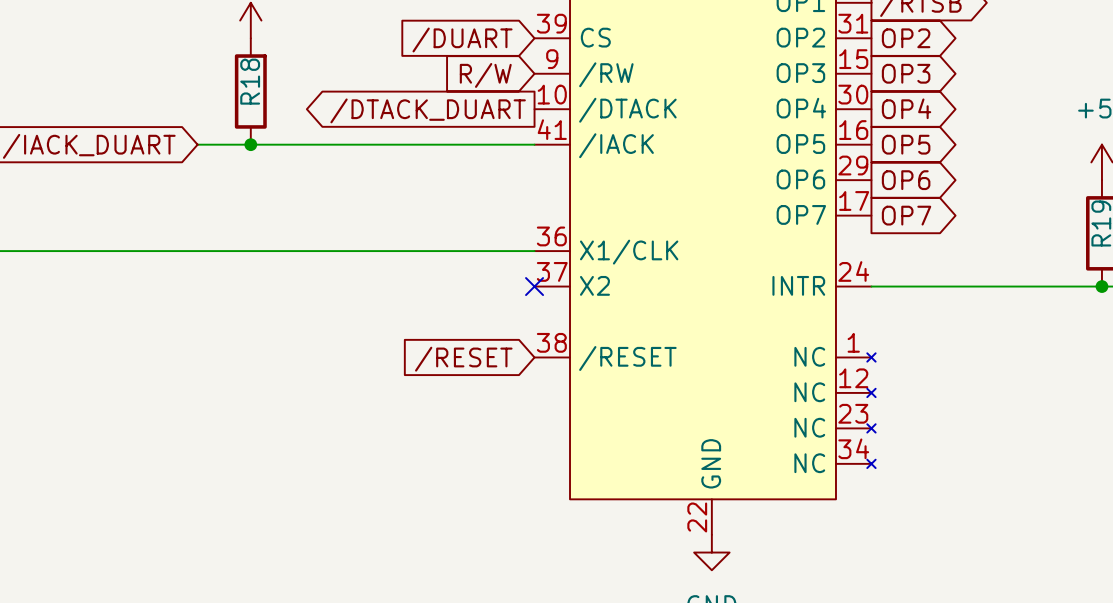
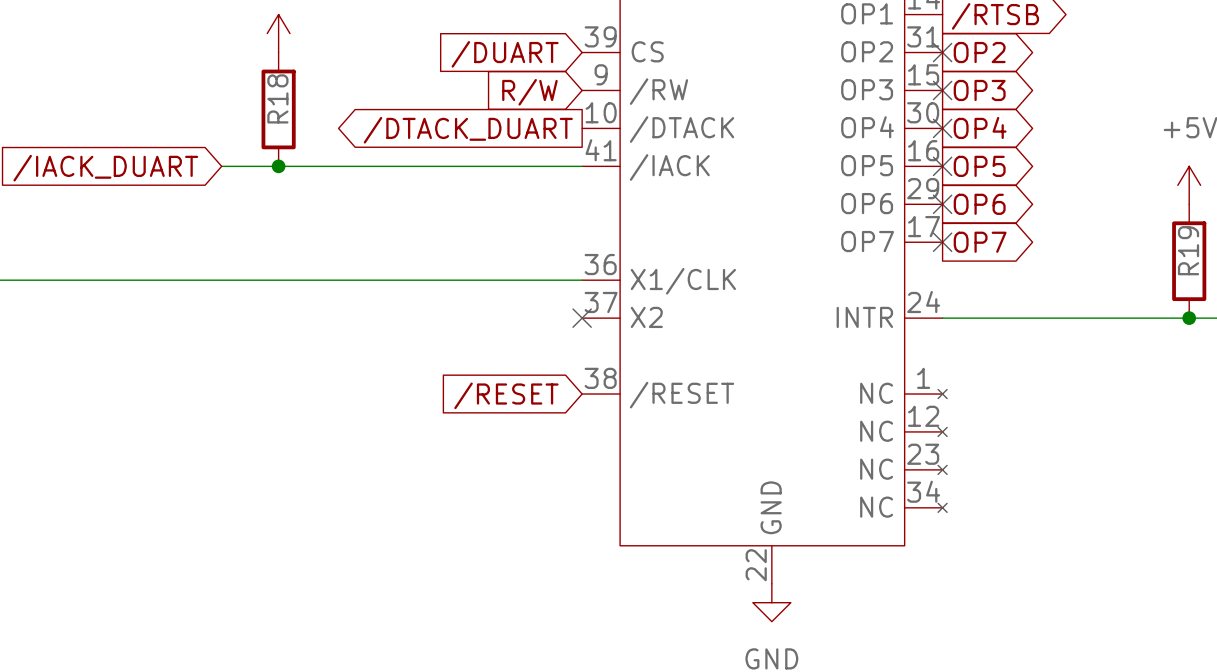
no-connect mark: none -> (942, 52)
no-connect mark: none -> (942, 90)
no-connect mark: none -> (942, 128)
no-connect mark: none -> (942, 166)
no-connect mark: none -> (942, 204)
no-connect mark: none -> (942, 242)

